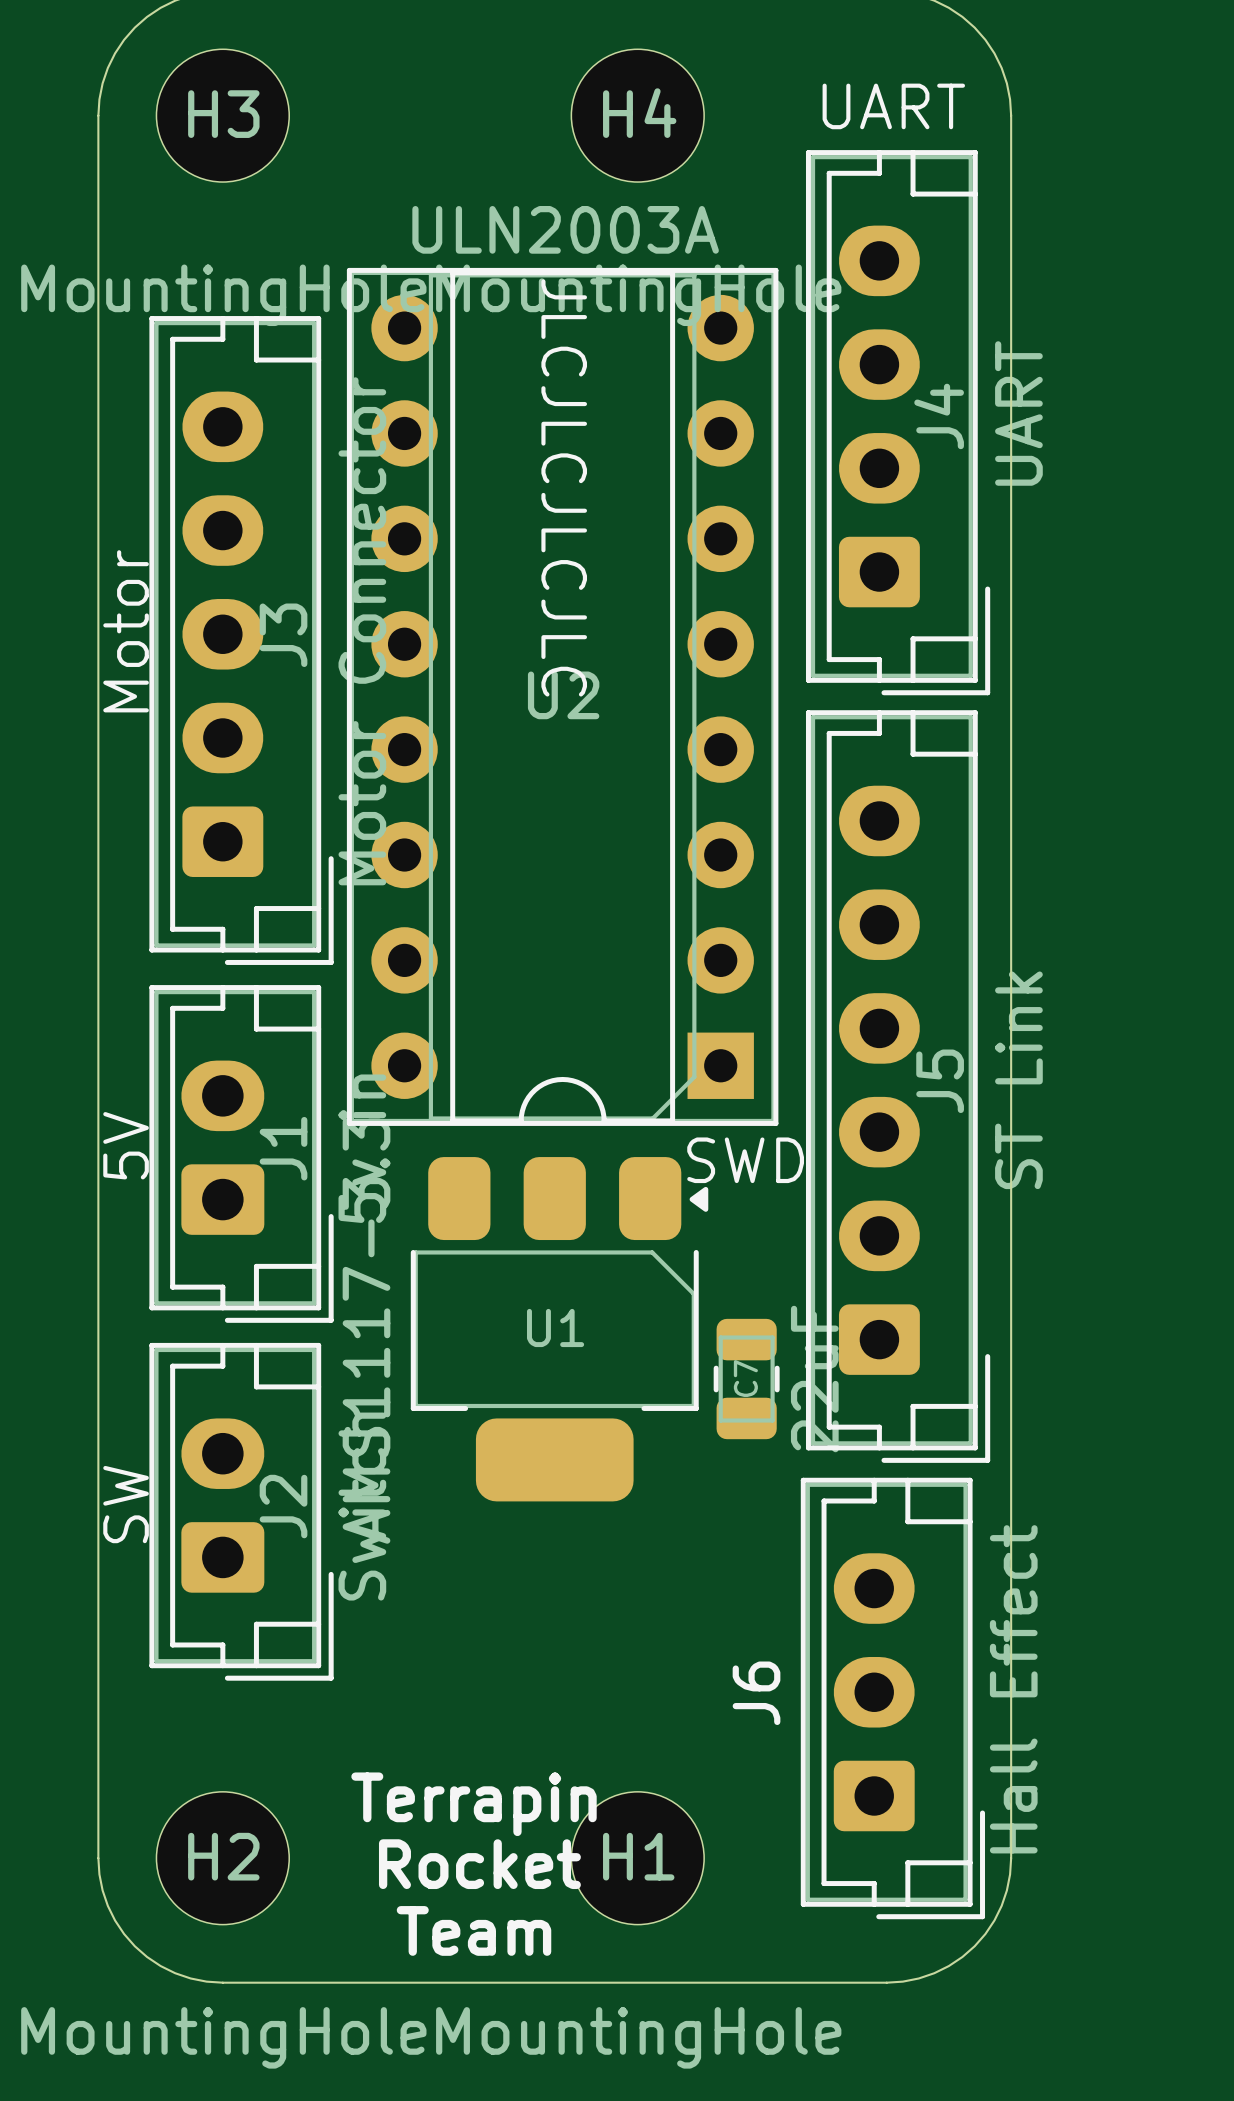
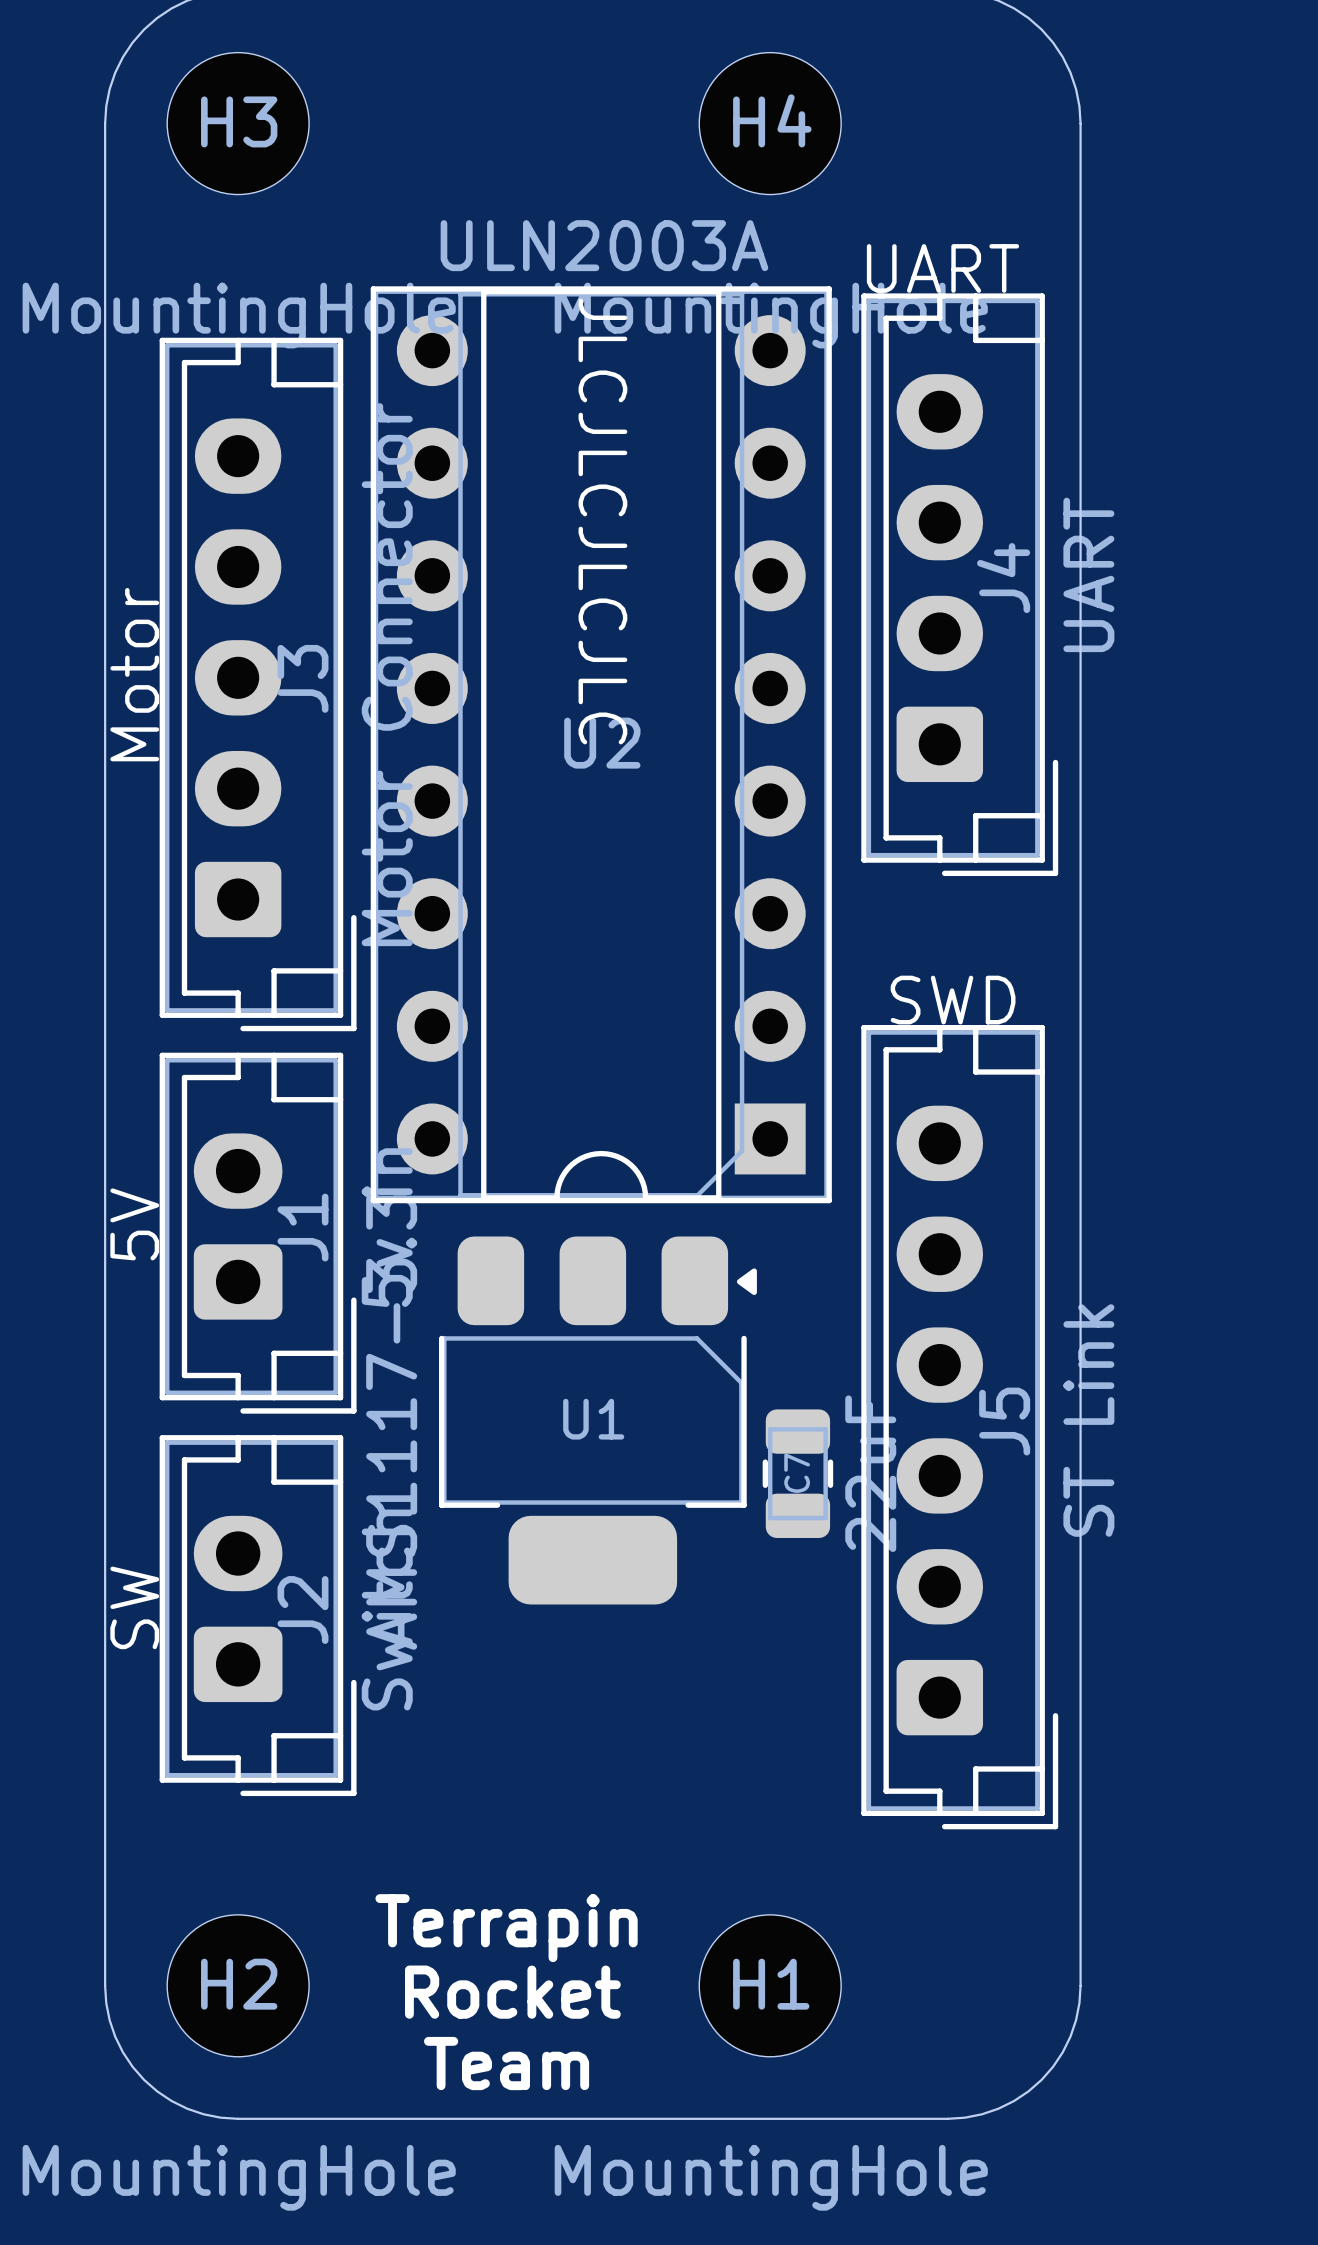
text position: UART (893, 106) -> UART (942, 268)
H4 position: (637, 115) -> (770, 123)
J4 position: (898, 422) -> (959, 584)
J5 position: (898, 1086) -> (959, 1427)
text position: SWD (745, 1160) -> SWD (953, 1000)
J6: Hall Effect (892, 1698) -> none
H1 position: (637, 1858) -> (770, 1985)

